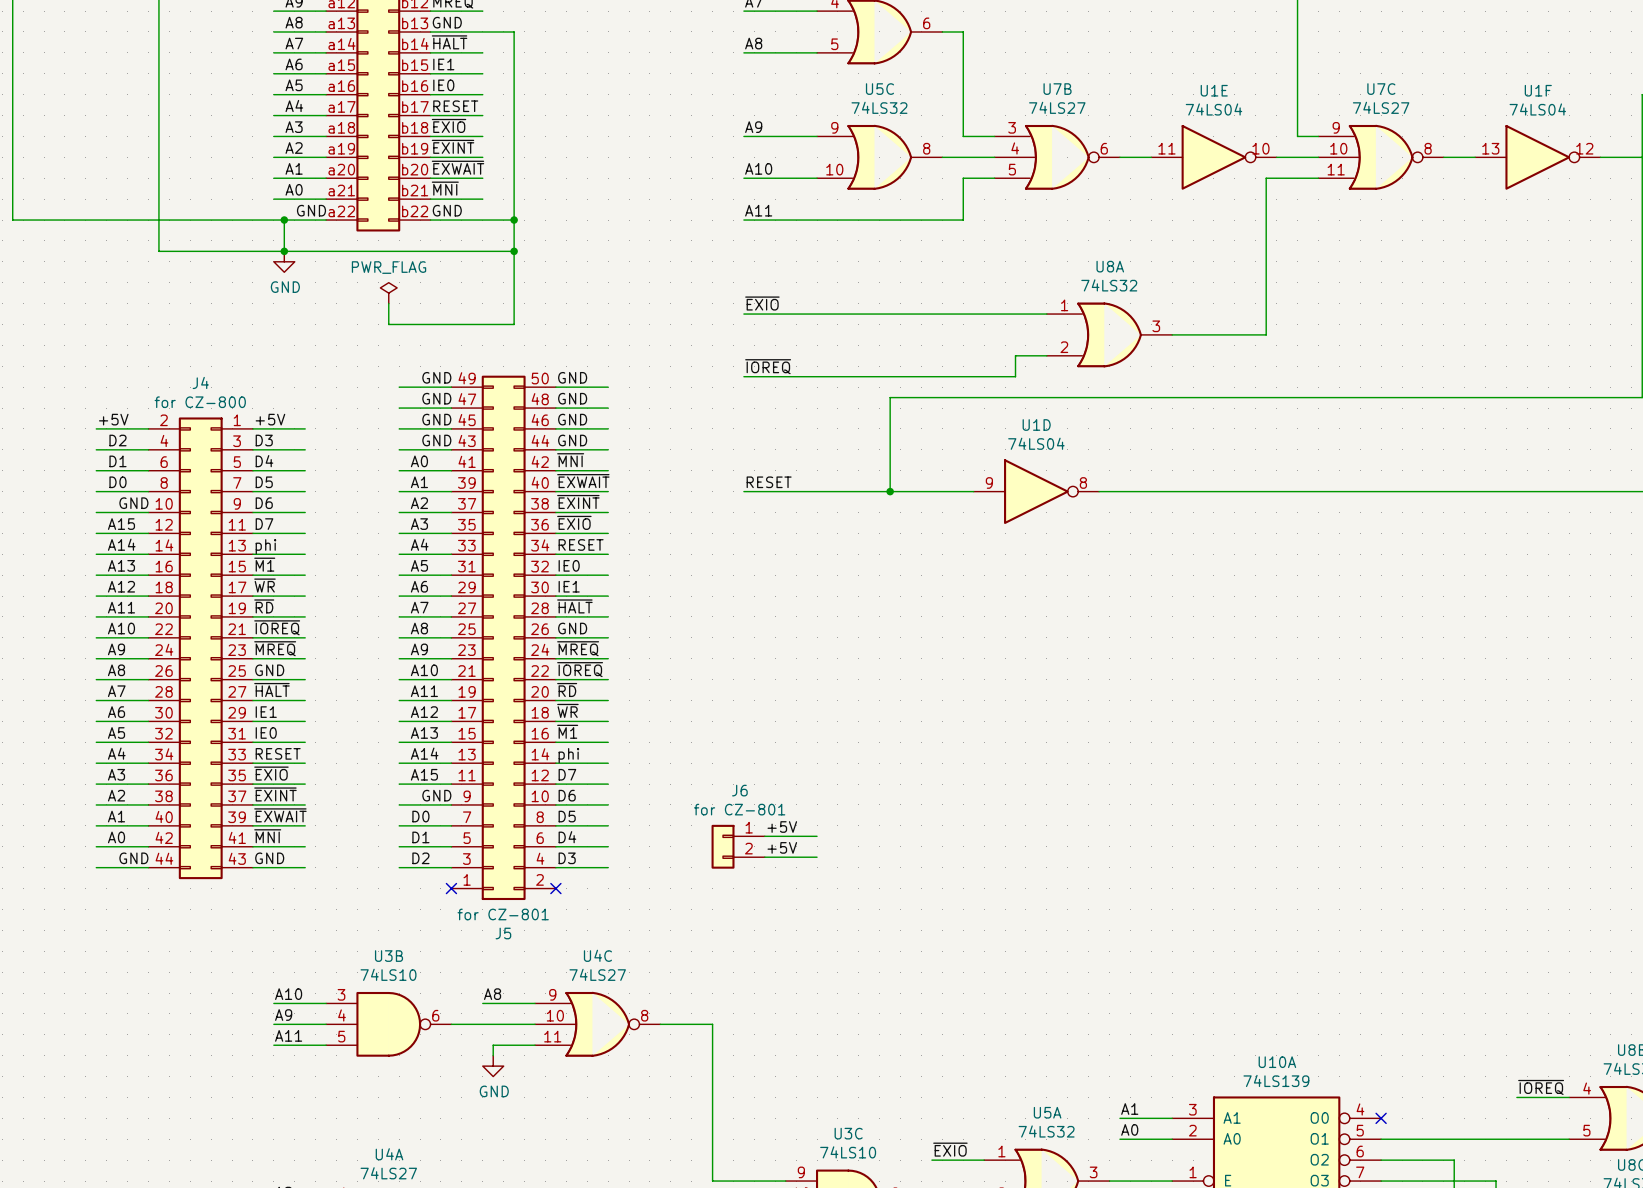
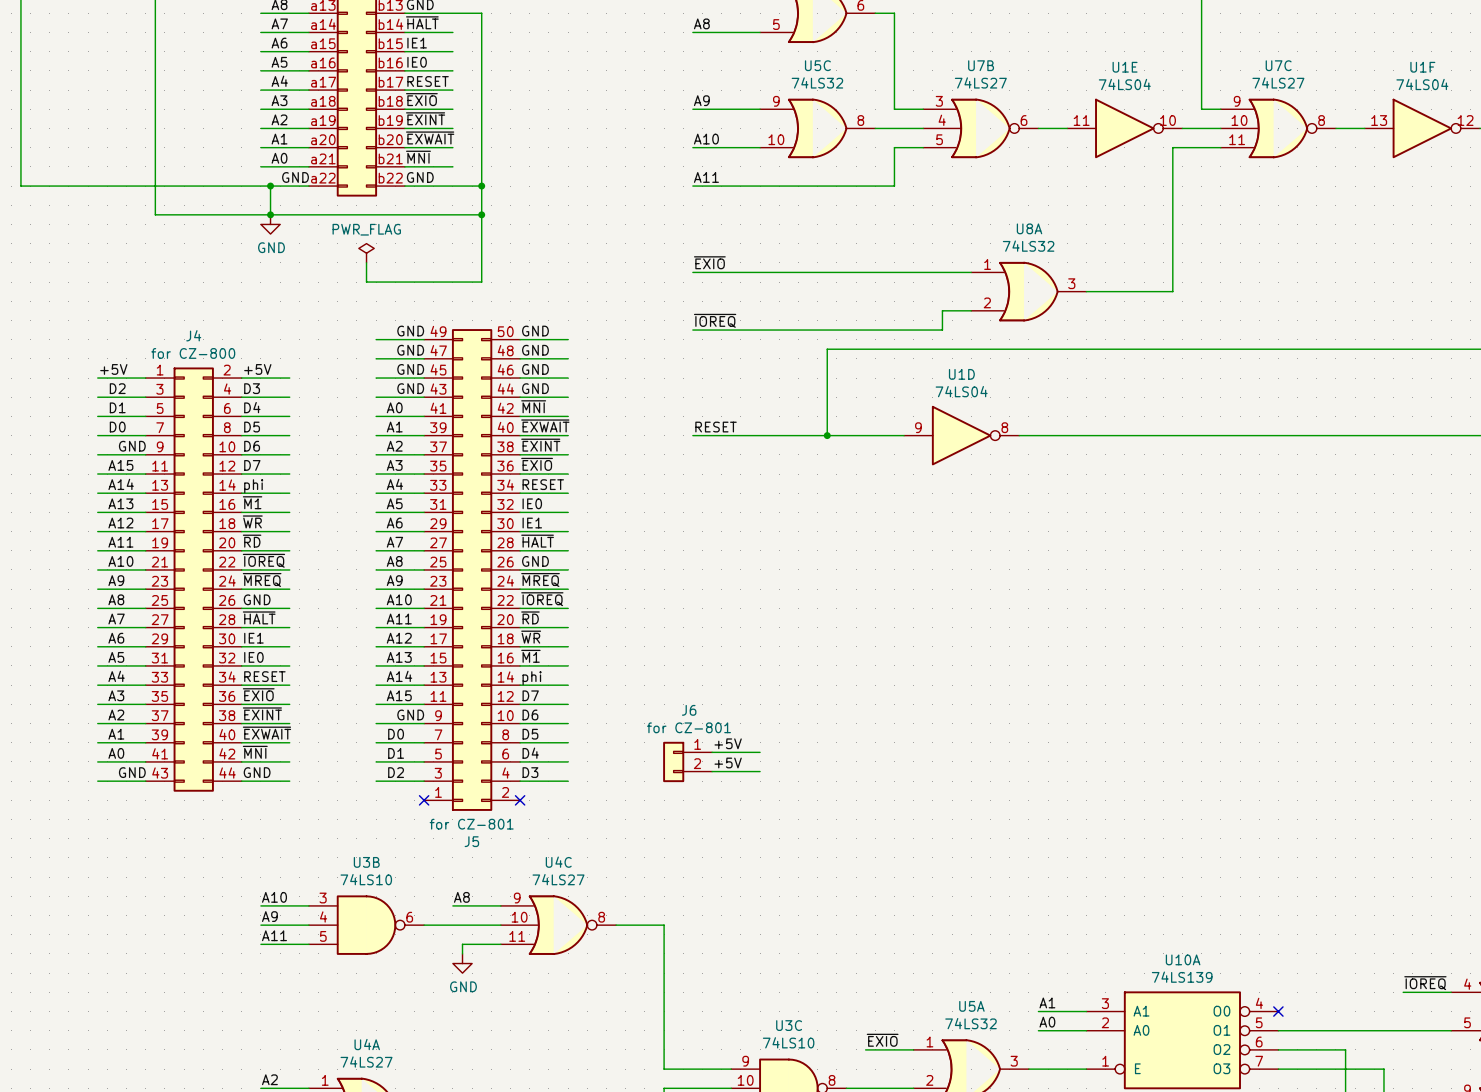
J4 flip: as is (200, 648) -> left-right (193, 579)

